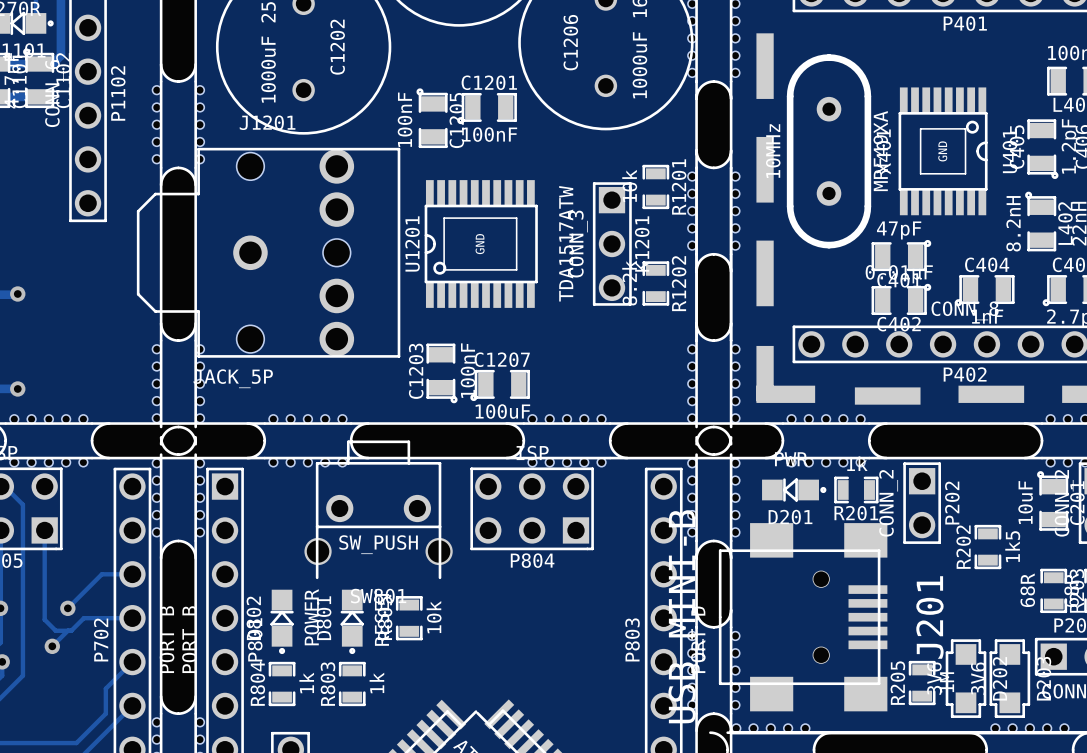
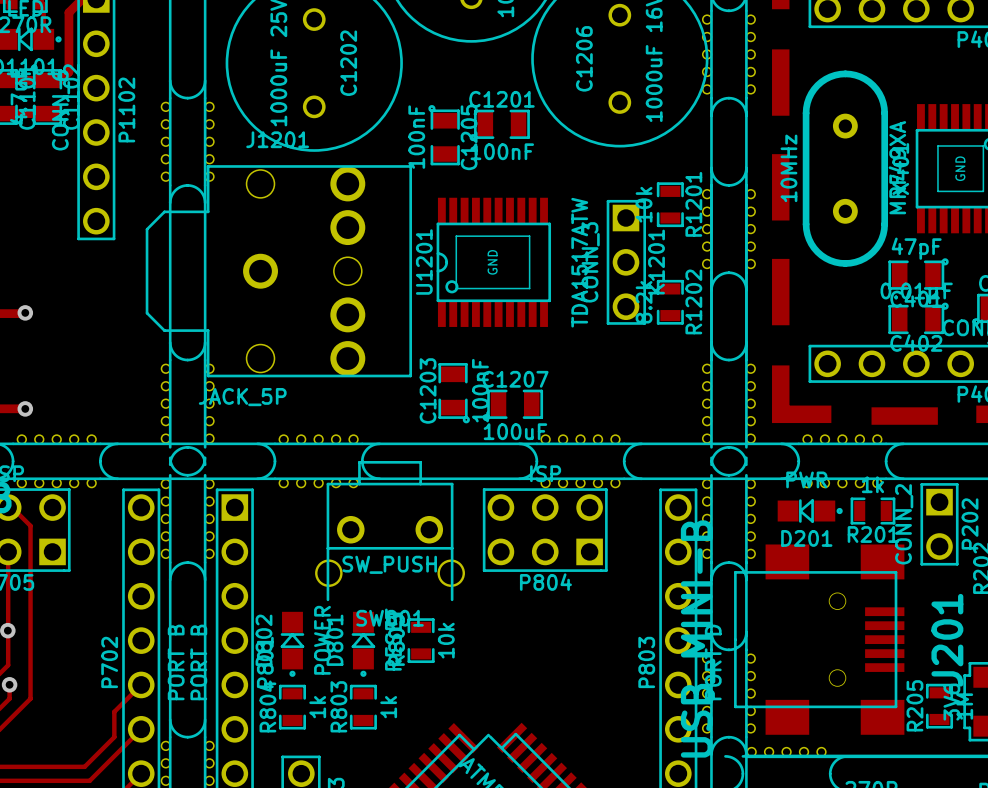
track: (44, 530) (44, 619) (55, 630) (71, 630) (83, 618) (132, 618) -> none
track: (132, 574) (101, 574) (67, 608) -> none
via: (67, 608) -> none
track: (67, 630) (52, 646) -> none
via: (52, 646) -> none

